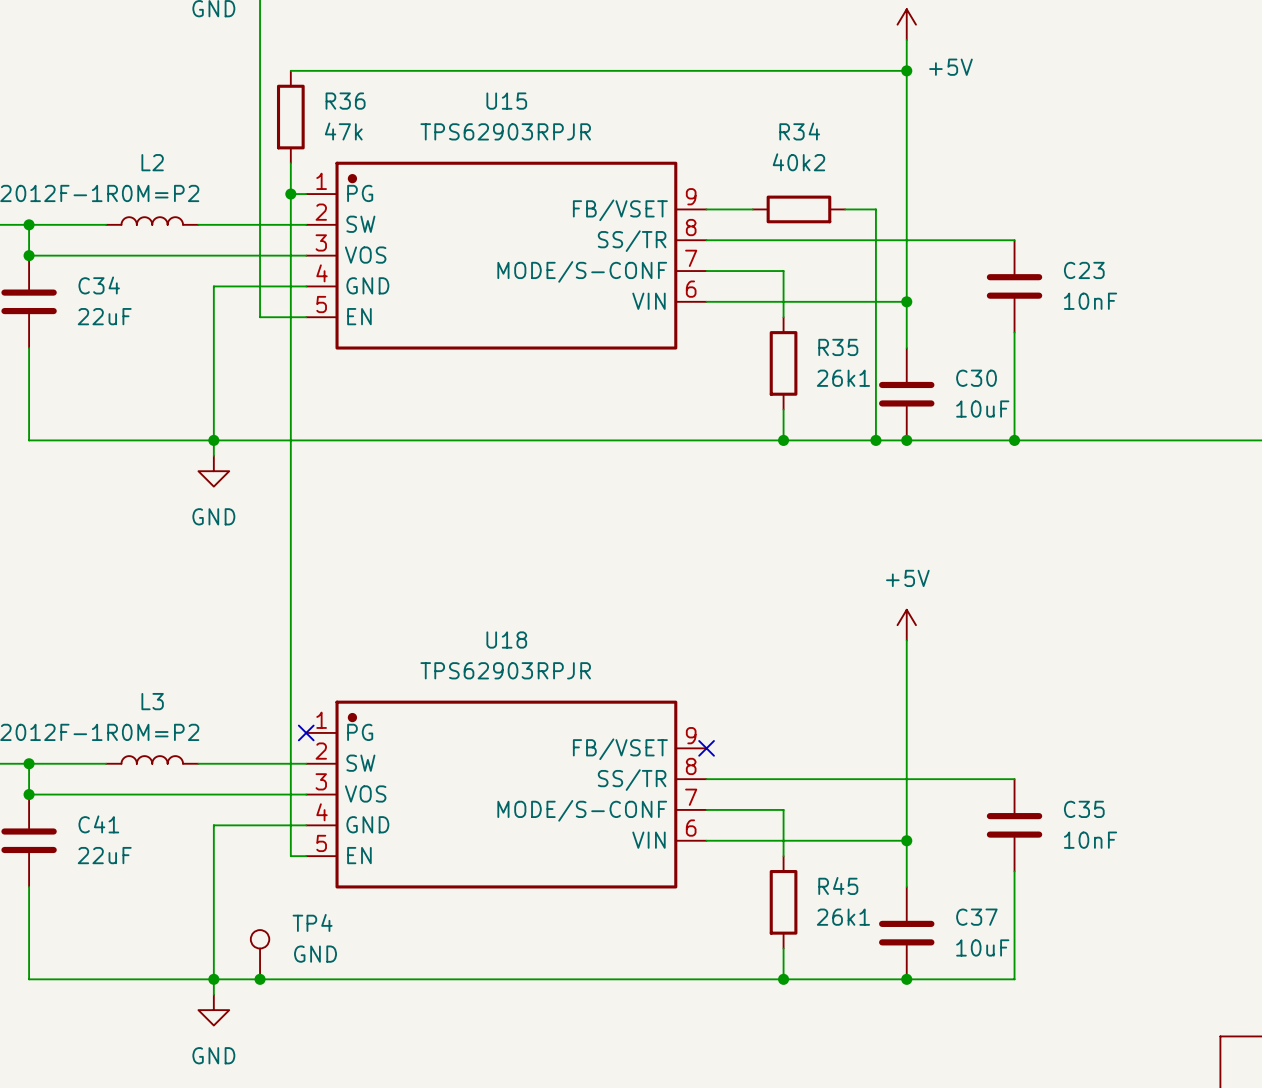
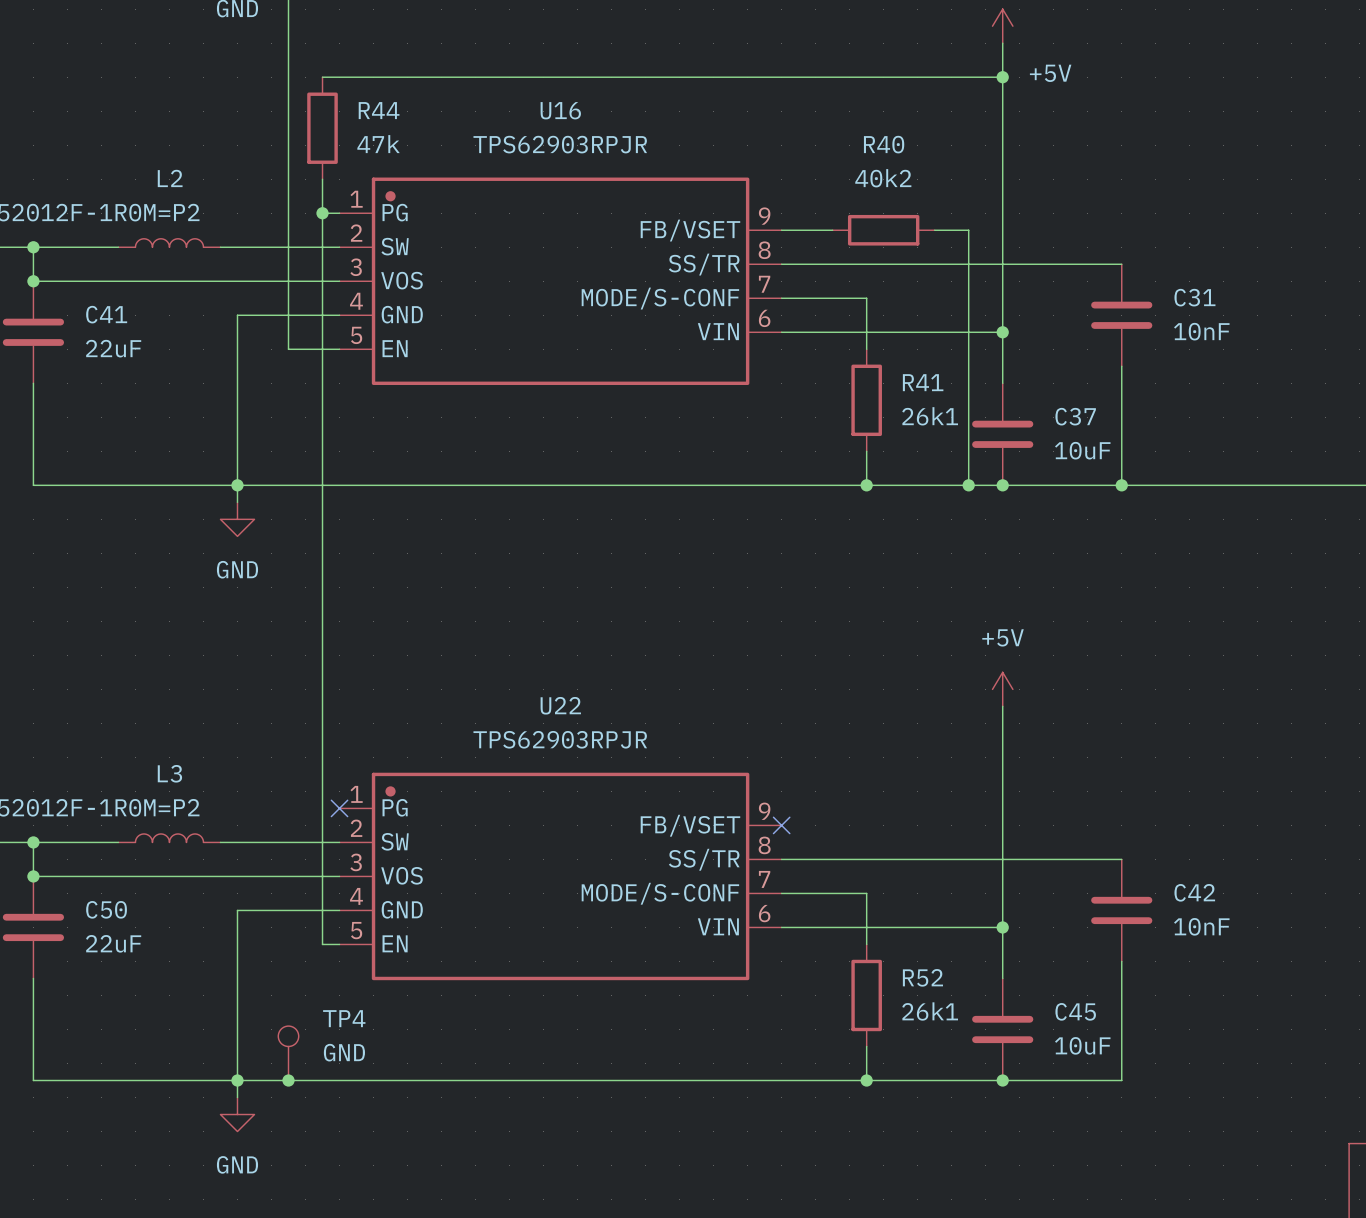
R36 name: R36 (345, 101) -> R44 (379, 110)
U15 name: U15 (506, 101) -> U16 (560, 110)
R34 name: R34 (799, 131) -> R40 (884, 144)
C23 name: C23 (1084, 270) -> C31 (1194, 297)
C34 name: C34 (99, 285) -> C41 (106, 314)
R35 name: R35 (838, 347) -> R41 (923, 382)
C30 name: C30 (976, 378) -> C37 (1075, 416)
U18 name: U18 (506, 640) -> U22 (560, 705)
C35 name: C35 (1084, 809) -> C42 (1194, 892)
C41 name: C41 (98, 824) -> C50 (106, 909)
R45 name: R45 (838, 886) -> R52 (922, 977)
C37 name: C37 (976, 917) -> C45 (1075, 1011)

